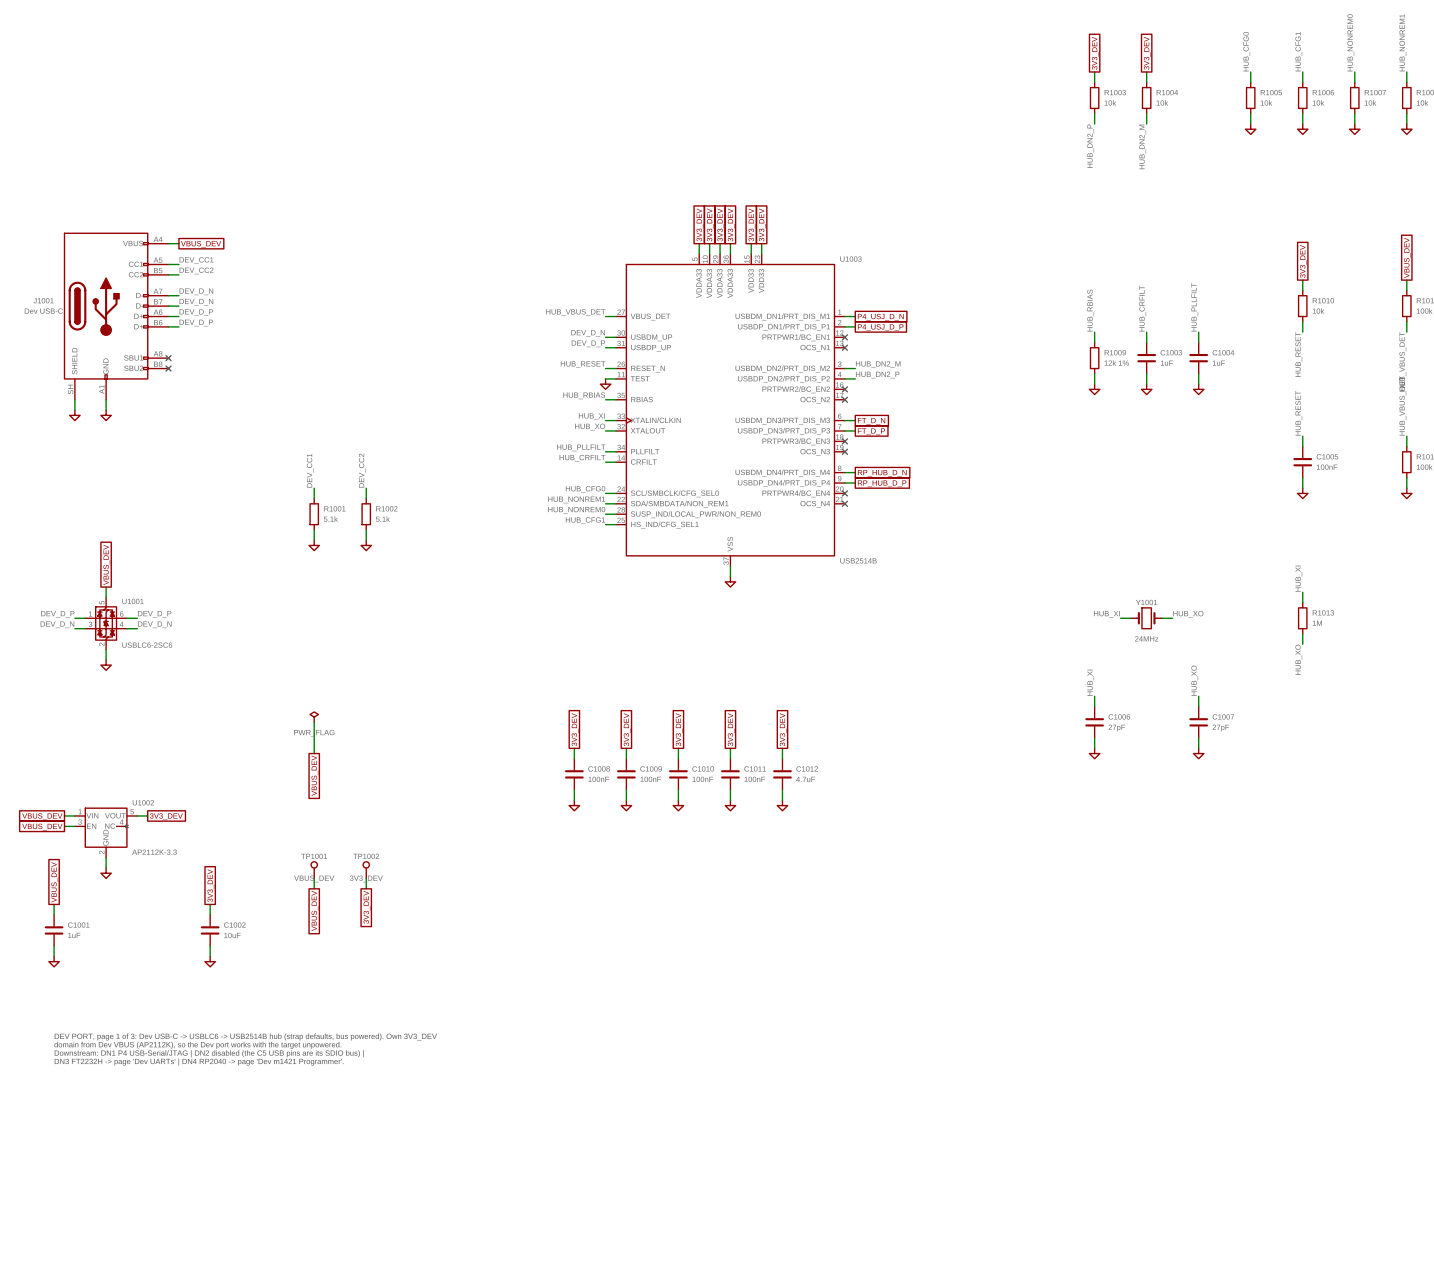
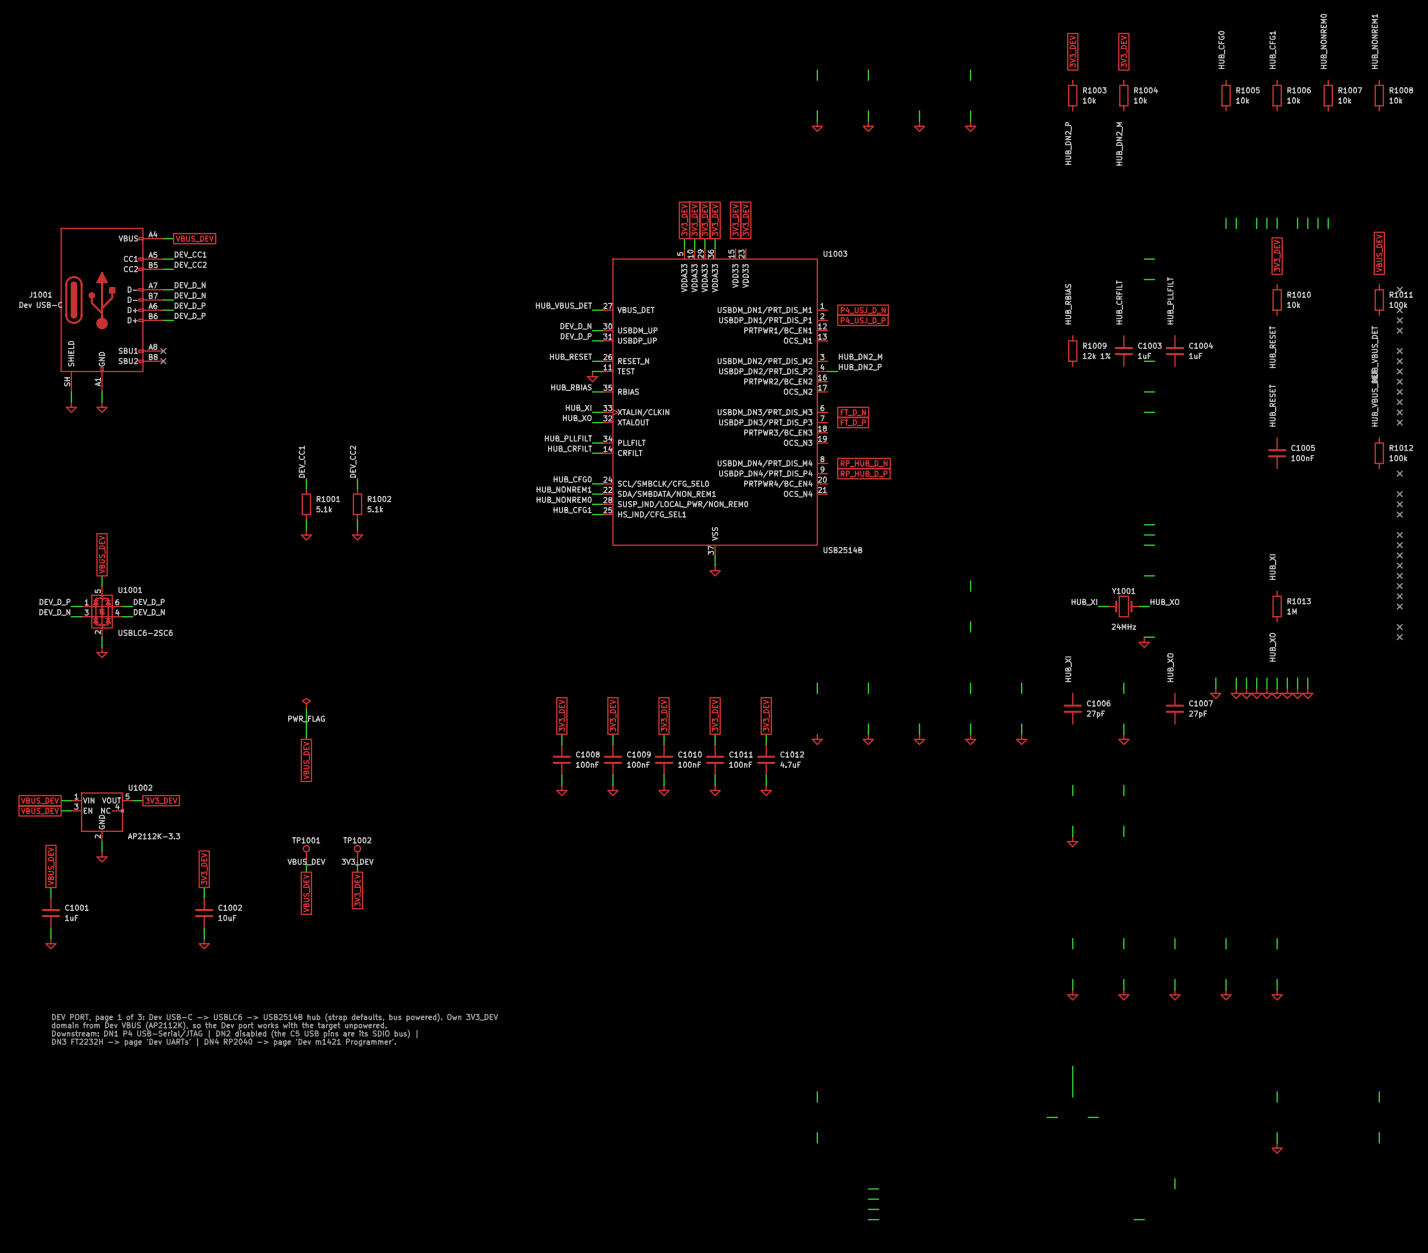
wire: none -> (817, 70) (817, 80)
wire: none -> (868, 70) (868, 80)
wire: none -> (970, 70) (970, 80)
wire: (1094, 71) (1094, 82) -> none
wire: (1146, 71) (1146, 82) -> none
wire: (1250, 71) (1250, 82) -> none
wire: (1302, 71) (1302, 82) -> none
wire: (1354, 71) (1354, 82) -> none
wire: (1406, 71) (1406, 82) -> none
wire: none -> (817, 110) (817, 121)
wire: none -> (868, 110) (868, 121)
wire: none -> (919, 110) (919, 121)
wire: none -> (970, 110) (970, 121)
wire: (1094, 113) (1094, 124) -> none
wire: (1146, 113) (1146, 124) -> none
wire: (1250, 113) (1250, 124) -> none
wire: (1302, 113) (1302, 124) -> none
wire: (1354, 113) (1354, 124) -> none
wire: (1406, 113) (1406, 124) -> none
power symbol: none -> (817, 126)
power symbol: none -> (868, 126)
power symbol: none -> (919, 126)
power symbol: none -> (970, 126)
power symbol: (1250, 129) -> none
power symbol: (1302, 129) -> none
power symbol: (1354, 129) -> none
power symbol: (1406, 129) -> none
wire: none -> (1236, 218) (1236, 228)
wire: none -> (1256, 218) (1256, 228)
wire: none -> (1266, 218) (1266, 228)
wire: none -> (1297, 218) (1297, 228)
wire: none -> (1307, 218) (1307, 228)
wire: none -> (1318, 218) (1318, 228)
wire: (751, 243) (751, 254) -> none
wire: (761, 243) (761, 254) -> none
wire: none -> (1144, 259) (1154, 259)
wire: (1302, 280) (1302, 290) -> (1226, 218) (1226, 228)
wire: (1406, 280) (1406, 290) -> (1328, 218) (1328, 228)
wire: none -> (1144, 279) (1154, 279)
no-connect mark: none -> (1399, 289)
wire: (844, 316) (855, 316) -> none
no-connect mark: none -> (1399, 310)
wire: (1302, 321) (1302, 332) -> (1277, 218) (1277, 228)
wire: (1406, 321) (1406, 332) -> none
wire: (844, 326) (855, 326) -> none
no-connect mark: none -> (1399, 320)
wire: (1094, 332) (1094, 342) -> none
wire: (1146, 332) (1146, 342) -> none
wire: (1198, 332) (1198, 342) -> none
no-connect mark: (844, 337) -> none
no-connect mark: none -> (1399, 330)
no-connect mark: (844, 347) -> none
no-connect mark: none -> (1399, 351)
wire: (844, 368) (855, 368) -> none
wire: none -> (1144, 361) (1154, 361)
no-connect mark: none -> (1399, 361)
wire: (1094, 373) (1094, 384) -> none
wire: (1146, 373) (1146, 384) -> none
wire: (1198, 373) (1198, 384) -> none
no-connect mark: none -> (1399, 371)
no-connect mark: (844, 389) -> none
power symbol: (1094, 389) -> none
power symbol: (1146, 389) -> none
power symbol: (1198, 389) -> none
no-connect mark: none -> (1399, 381)
no-connect mark: (844, 399) -> none
wire: none -> (1144, 391) (1154, 391)
no-connect mark: none -> (1399, 391)
no-connect mark: none -> (1399, 402)
wire: (844, 420) (855, 420) -> none
wire: none -> (1144, 412) (1154, 412)
no-connect mark: none -> (1399, 412)
wire: (844, 430) (855, 430) -> none
no-connect mark: none -> (1399, 422)
wire: (1302, 436) (1302, 446) -> none
wire: (1406, 436) (1406, 446) -> none
no-connect mark: (844, 441) -> none
no-connect mark: (844, 451) -> none
wire: (844, 472) (855, 472) -> none
wire: (1302, 477) (1302, 488) -> none
wire: (1406, 477) (1406, 488) -> none
wire: (844, 483) (855, 483) -> none
no-connect mark: none -> (1399, 473)
no-connect mark: (844, 493) -> none
power symbol: (1302, 493) -> none
power symbol: (1406, 493) -> none
no-connect mark: (844, 503) -> none
no-connect mark: none -> (1399, 494)
no-connect mark: none -> (1399, 504)
no-connect mark: none -> (1399, 514)
wire: none -> (1144, 524) (1154, 524)
wire: none -> (1144, 534) (1154, 534)
no-connect mark: none -> (1399, 534)
wire: none -> (1144, 545) (1154, 545)
no-connect mark: none -> (1399, 545)
no-connect mark: none -> (1399, 555)
no-connect mark: none -> (1399, 565)
wire: none -> (1144, 575) (1154, 575)
no-connect mark: none -> (1399, 575)
wire: none -> (970, 580) (970, 591)
wire: (1302, 592) (1302, 602) -> (1266, 678) (1266, 688)
no-connect mark: none -> (1399, 586)
no-connect mark: none -> (1399, 596)
no-connect mark: none -> (1399, 606)
wire: none -> (970, 621) (970, 632)
wire: (1302, 633) (1302, 644) -> (1277, 678) (1277, 688)
no-connect mark: none -> (1399, 626)
wire: none -> (1144, 637) (1154, 637)
no-connect mark: none -> (1399, 637)
power symbol: none -> (1144, 642)
wire: none -> (1215, 678) (1215, 688)
wire: none -> (1236, 678) (1236, 688)
wire: none -> (1246, 678) (1246, 688)
wire: none -> (1256, 678) (1256, 688)
wire: none -> (1287, 678) (1287, 688)
wire: none -> (1297, 678) (1297, 688)
wire: none -> (1307, 678) (1307, 688)
wire: none -> (817, 683) (817, 693)
wire: none -> (868, 683) (868, 693)
wire: none -> (970, 683) (970, 693)
wire: (1094, 696) (1094, 706) -> (1021, 683) (1021, 693)
wire: (1198, 696) (1198, 706) -> (1123, 683) (1123, 693)
power symbol: none -> (1215, 693)
power symbol: none -> (1236, 693)
power symbol: none -> (1246, 693)
power symbol: none -> (1256, 693)
power symbol: none -> (1266, 693)
power symbol: none -> (1277, 693)
power symbol: none -> (1287, 693)
power symbol: none -> (1297, 693)
power symbol: none -> (1307, 693)
wire: none -> (868, 724) (868, 734)
wire: none -> (919, 724) (919, 734)
wire: none -> (970, 724) (970, 734)
wire: (1094, 737) (1094, 748) -> (1021, 724) (1021, 734)
wire: (1198, 737) (1198, 748) -> (1123, 724) (1123, 734)
power symbol: none -> (817, 739)
power symbol: none -> (868, 739)
power symbol: none -> (919, 739)
power symbol: none -> (970, 739)
power symbol: none -> (1021, 739)
power symbol: (1094, 753) -> none
power symbol: none -> (1123, 739)
power symbol: (1198, 753) -> none
wire: none -> (1072, 785) (1072, 795)
wire: none -> (1123, 785) (1123, 795)
wire: none -> (1072, 826) (1072, 836)
wire: none -> (1123, 826) (1123, 836)
power symbol: none -> (1072, 841)
wire: none -> (1072, 938) (1072, 948)
wire: none -> (1123, 938) (1123, 948)
wire: none -> (1174, 938) (1174, 948)
wire: none -> (1226, 938) (1226, 948)
wire: none -> (1277, 938) (1277, 948)
wire: none -> (1072, 979) (1072, 989)
wire: none -> (1123, 979) (1123, 989)
wire: none -> (1174, 979) (1174, 989)
wire: none -> (1226, 979) (1226, 989)
wire: none -> (1277, 979) (1277, 989)
power symbol: none -> (1072, 994)
power symbol: none -> (1123, 994)
power symbol: none -> (1174, 994)
power symbol: none -> (1226, 994)
power symbol: none -> (1277, 994)
wire: none -> (1072, 1066) (1072, 1096)
wire: none -> (817, 1091) (817, 1102)
wire: none -> (1277, 1091) (1277, 1102)
wire: none -> (1379, 1091) (1379, 1102)
wire: none -> (1047, 1117) (1057, 1117)
wire: none -> (1088, 1117) (1098, 1117)
wire: none -> (817, 1132) (817, 1142)
wire: none -> (1277, 1132) (1277, 1142)
wire: none -> (1379, 1132) (1379, 1142)
power symbol: none -> (1277, 1148)
wire: none -> (1174, 1178) (1174, 1188)
wire: none -> (868, 1188) (878, 1188)
wire: none -> (868, 1199) (878, 1199)
wire: none -> (868, 1209) (878, 1209)
wire: none -> (868, 1219) (878, 1219)
wire: none -> (1134, 1219) (1144, 1219)

